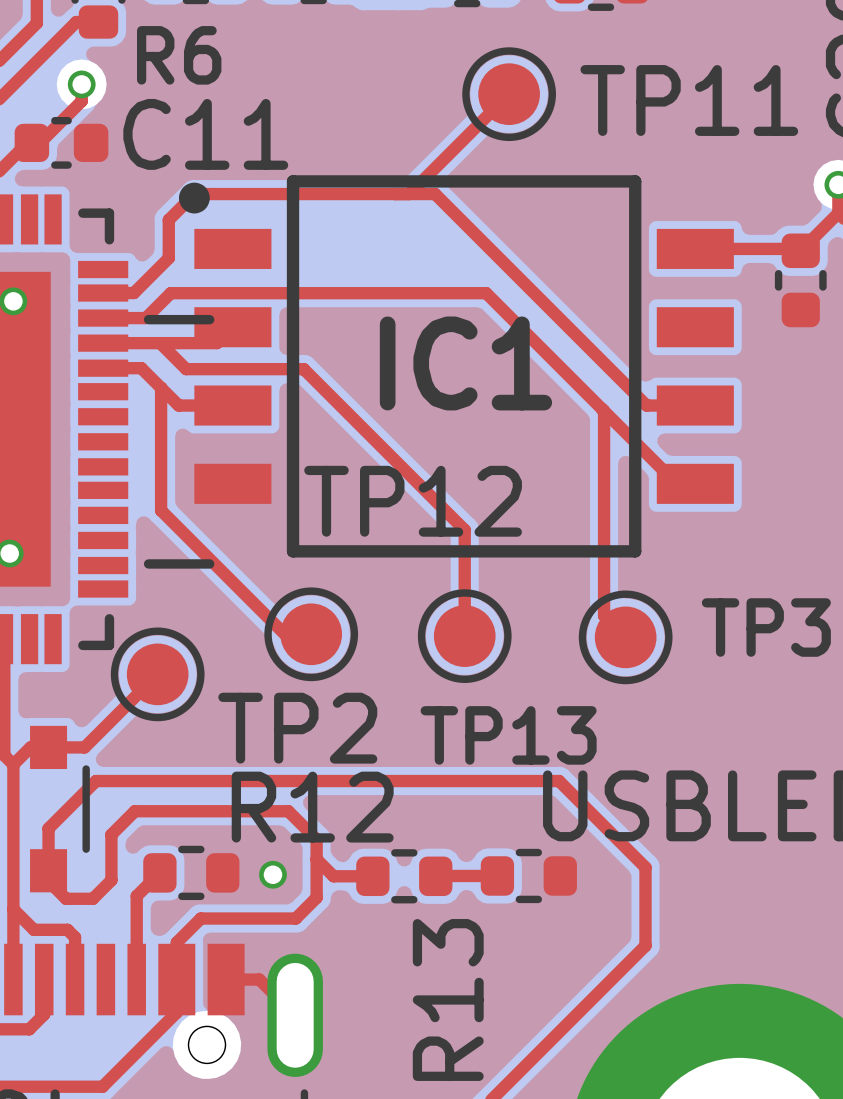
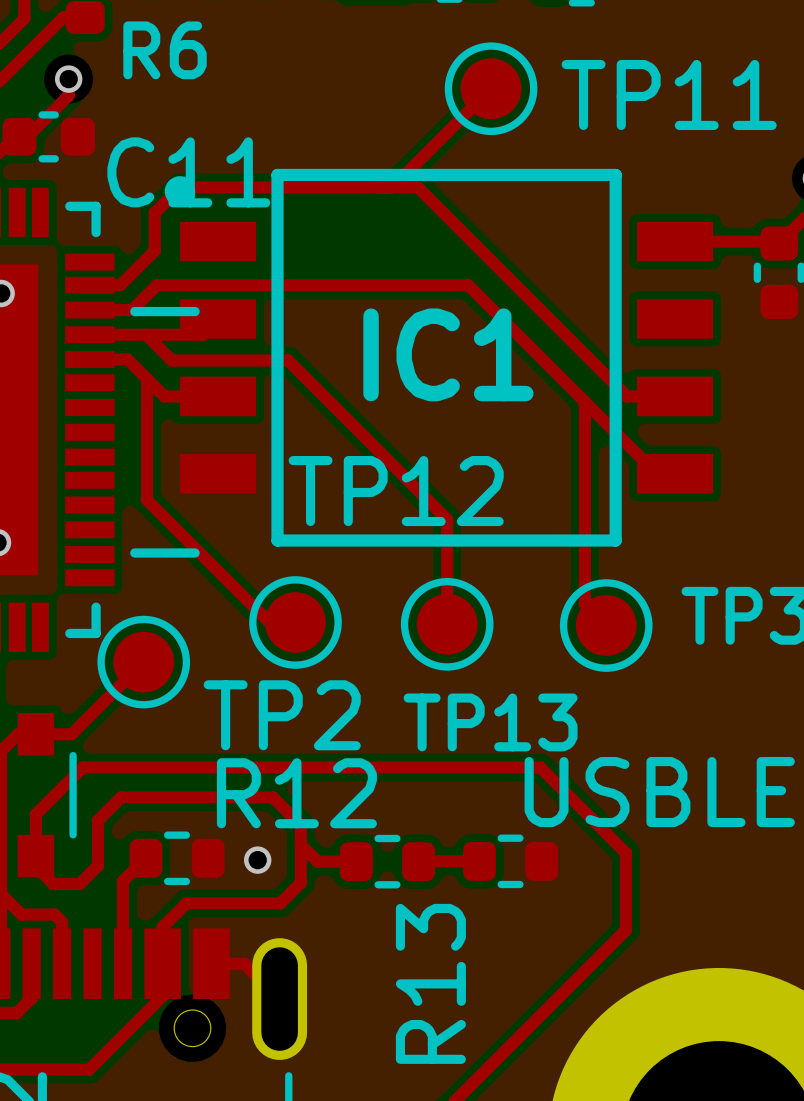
C11 name position: C11 (205, 134) -> C11 (188, 172)

